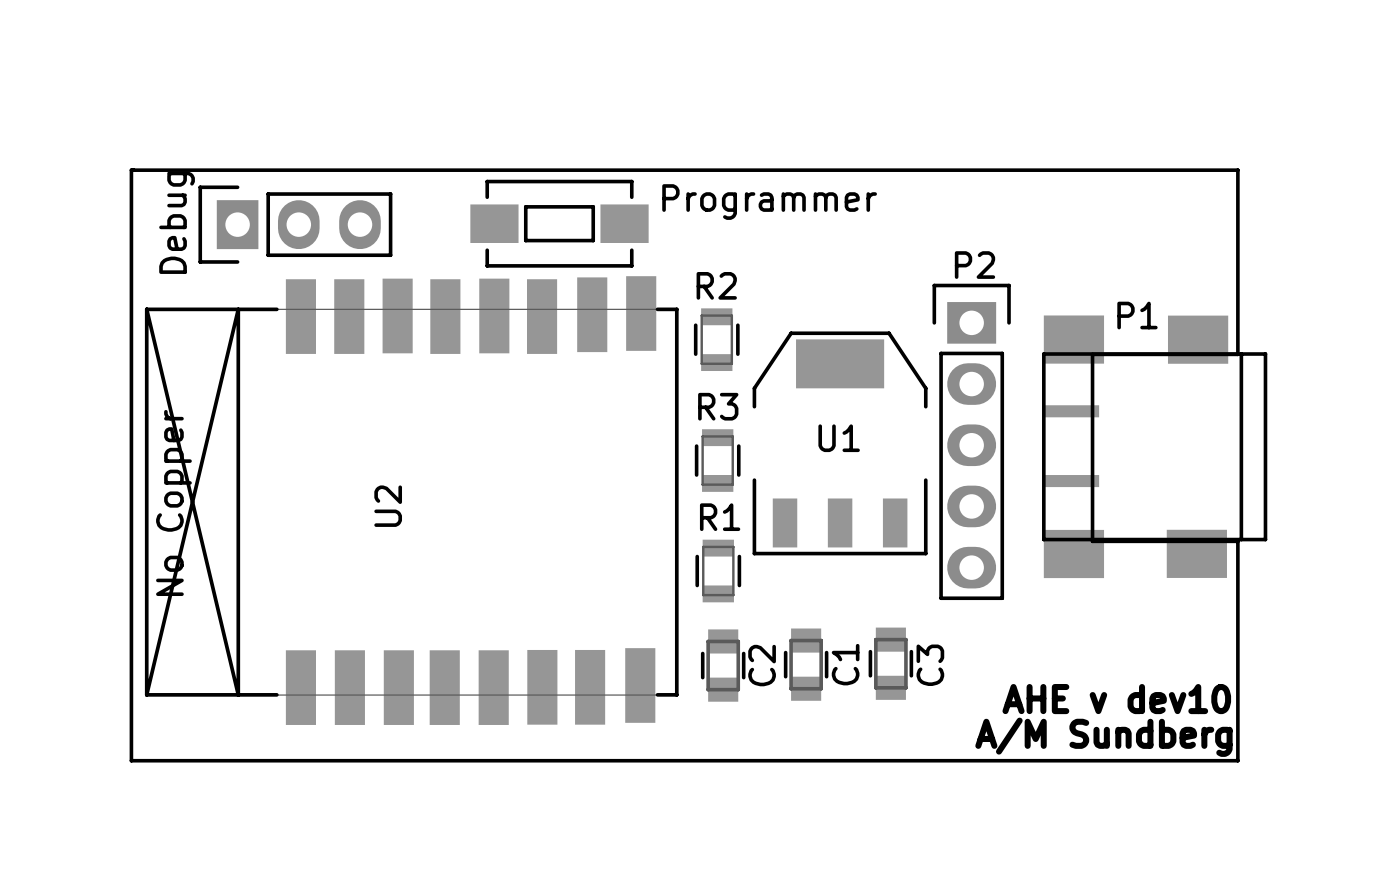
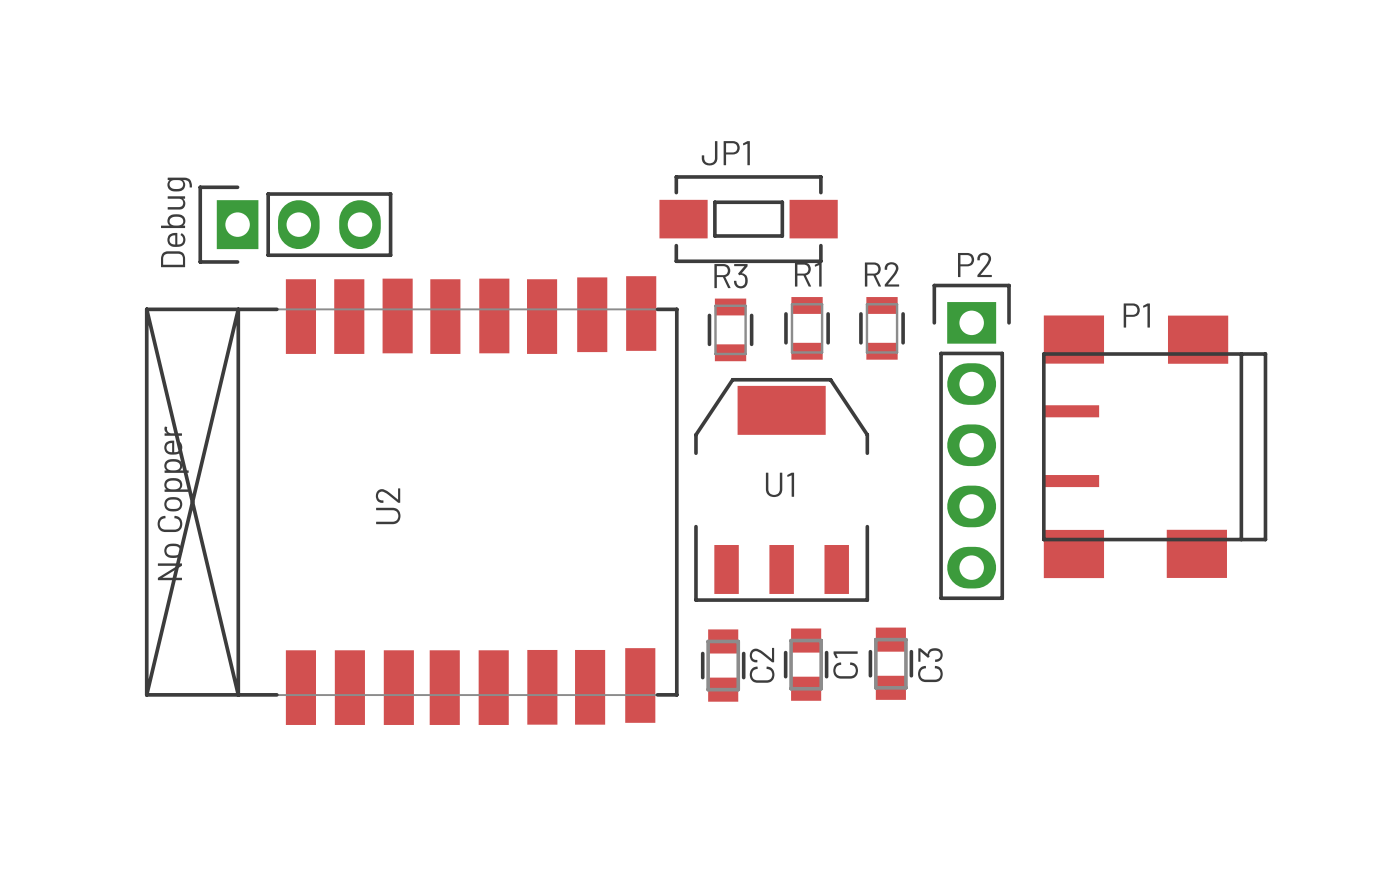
board edge: (131, 170) (1237, 170) (1237, 354) (1092, 354) (1092, 541) (1237, 541) (1237, 760) (131, 760) (131, 170) -> none
JP1: none -> (748, 219)
Programmer: (559, 223) -> none
R2 position: (716, 339) -> (882, 328)
U1 position: (840, 443) -> (781, 489)
R3 position: (717, 460) -> (730, 329)
R1 position: (718, 571) -> (807, 328)
text: AHE v dev10 (1116, 699) -> none
text: A/M Sundberg (1103, 737) -> none

